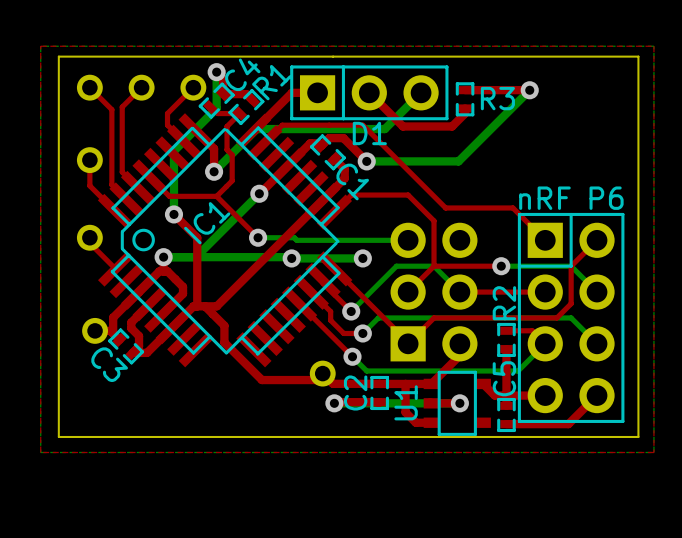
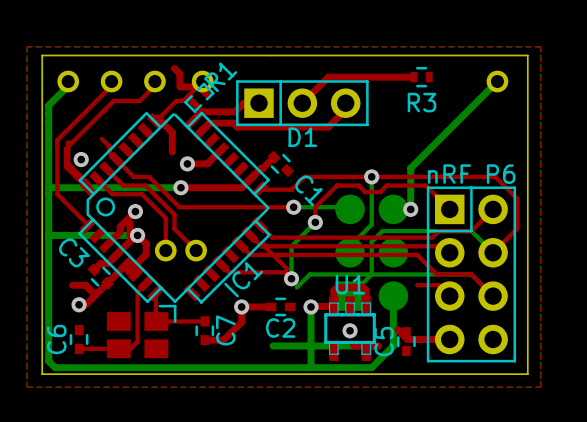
bottom track: (216, 72) (216, 108) (173, 151) (173, 214) -> none
via: (216, 72) -> none
R3 footprint: [455, 82, 475, 117] -> [410, 66, 433, 88]
top track: none -> (413, 77) (328, 77) (302, 103)
top track: (89, 87) (111, 109) (111, 184) (126, 200) -> none
bottom track: none -> (72, 81) (48, 105) (48, 361) (55, 367) (371, 367) (393, 345) (393, 298)
top track: (141, 87) (122, 107) (122, 172) (138, 188) -> none
top track: none -> (115, 81) (57, 140) (57, 194) (88, 225)
top track: (193, 87) (167, 113) (167, 125) (184, 142) -> none
top track: none -> (159, 81) (139, 101) (113, 101) (66, 148) (66, 167) (88, 189)
top track: none -> (202, 81) (183, 101) (176, 101) (155, 121)
part: none -> (202, 81)
bottom track: none -> (497, 81) (410, 168) (410, 209)
part: none -> (497, 81)
top track: (465, 90) (529, 90) -> none
bottom track: (529, 90) (458, 161) (366, 161) -> none
via: (529, 90) -> none
top track: (317, 92) (291, 92) (253, 131) -> none
top track: (369, 92) (402, 126) (452, 126) (465, 113) (465, 108) -> none
D1 position: (369, 92) -> (302, 103)
bottom track: (421, 92) (384, 129) (256, 129) (214, 171) -> none
R3 name position: R3 (497, 98) -> R3 (421, 102)
C4: (216, 100) -> none
top track: (211, 107) (217, 113) (239, 113) (227, 126) (227, 149) (232, 154) (232, 180) (216, 196) -> none
IC1 footprint: [97, 113, 353, 368] -> [78, 111, 271, 304]
top track: none -> (258, 103) (243, 103) (235, 111) (201, 111) (191, 121)
top track: none -> (345, 103) (345, 109) (328, 127) (237, 127) (233, 123) (209, 123) (201, 131)
C1 footprint: [309, 134, 346, 171] -> [267, 150, 294, 178]
top track: (264, 142) (282, 125) (362, 125) (445, 207) (512, 207) (516, 211) -> (315, 222) (315, 207) (337, 185) (358, 185) (365, 192) (380, 192) (386, 185) (425, 185)
top track: none -> (101, 138) (109, 146) (109, 152) (133, 176) (149, 176) (179, 207) (293, 207)
top track: (334, 158) (344, 169) (344, 178) (216, 306) (193, 306) (147, 352) (132, 352) (139, 346) (139, 336) (131, 328) (131, 322) (150, 303) -> none
part: (89, 160) -> none
top track: (366, 161) (343, 138) (329, 138) (321, 145) (318, 143) (310, 143) (259, 193) -> none
via: (366, 161) -> none
top track: none -> (220, 150) (207, 163) (187, 163)
via: (214, 171) -> none
top track: (150, 176) (169, 196) (216, 196) -> none
top track: none -> (274, 157) (241, 187) (180, 187)
via: none -> (81, 159)
via: none -> (187, 163)
top track: none -> (107, 169) (123, 185) (145, 185) (174, 214) (174, 228) (196, 250)
bottom track: (259, 193) (195, 257) -> none
via: (259, 193) -> none
top track: (216, 196) (258, 237) -> none
bottom track: none -> (371, 176) (371, 224) (350, 246) (350, 252)
via: none -> (371, 176)
top track: none -> (97, 179) (112, 194) (141, 194) (165, 218) (165, 250)
top track: (334, 212) (351, 195) (408, 195) (434, 220) (434, 266) -> none
bottom track: none -> (48, 187) (180, 187)
top track: (173, 214) (197, 237) (197, 306) -> none
via: (173, 214) -> none
via: none -> (180, 187)
top track: none -> (259, 189) (291, 189) (304, 176) (495, 176) (516, 198) (516, 228) (493, 252)
part footprint: [390, 222, 478, 362] -> [335, 194, 409, 311]
IC1 name position: IC1 (207, 223) -> IC1 (243, 279)
top track: (89, 237) (89, 243) (115, 269) -> none
part: (89, 237) -> none
bottom track: (258, 237) (294, 237) (296, 240) (408, 240) -> none
via: (258, 237) -> none
bottom track: none -> (293, 207) (347, 207) (350, 209)
via: none -> (293, 207)
top track: none -> (135, 211) (120, 226) (120, 231) (107, 244)
via: none -> (135, 211)
bottom track: none -> (315, 222) (291, 246) (291, 278)
via: none -> (315, 222)
bottom track: (163, 257) (362, 258) -> none
via: (163, 257) -> none
via: (291, 258) -> none
via: (362, 258) -> none
top track: none -> (259, 225) (272, 237) (432, 237) (438, 231) (471, 231)
top track: (434, 266) (501, 266) -> none
top track: (434, 266) (408, 292) -> none
bottom track: none -> (412, 231) (382, 231) (371, 241) (371, 274) (350, 296)
via position: (501, 266) -> (410, 209)
top track: (571, 266) (571, 303) (556, 317) -> (493, 296) (471, 274) (459, 274)
top track: (334, 268) (408, 343) (434, 317) (529, 317) -> (240, 244) (250, 254) (417, 254) (436, 274)
bottom track: none -> (48, 235) (137, 235)
via: none -> (137, 235)
top track: (183, 286) (167, 271) (159, 271) (113, 317) (113, 333) -> (146, 248) (146, 244) (136, 235) (107, 263) (100, 263) (94, 269)
part: none -> (165, 250)
part: none -> (196, 250)
top track: (311, 292) (330, 311) (330, 320) (343, 333) (362, 333) -> none
top track: (459, 292) (545, 292) -> (249, 234) (261, 246) (443, 246) (449, 252)
bottom track: (459, 292) (434, 266) (396, 266) (351, 311) -> none
top track: (299, 304) (352, 356) -> none
top track: none -> (126, 263) (85, 304)
top track: none -> (220, 264) (229, 272) (285, 272) (291, 278)
top track: (205, 306) (224, 325) (224, 342) (261, 380) (316, 380) (322, 373) (333, 383) (379, 383) -> none
via: (351, 311) -> none
via: none -> (291, 278)
C3 footprint: [108, 328, 145, 365] -> [87, 263, 115, 290]
top track: none -> (146, 283) (137, 291) (137, 341) (130, 348) (79, 348)
part: (95, 330) -> none
via: (362, 333) -> none
top track: none -> (155, 292) (156, 321) (204, 321)
R2: (506, 339) -> none
top track: (459, 343) (459, 355) (431, 383) (379, 383) -> none
bottom track: (545, 343) (518, 371) (366, 371) (352, 356) -> none
top track: (506, 349) (506, 405) -> none
via: none -> (79, 304)
via: none -> (241, 306)
top track: none -> (271, 306) (241, 306) (241, 322) (223, 340) (204, 340)
via: (352, 356) -> none
bottom track: none -> (311, 306) (311, 367)
via: none -> (311, 306)
top track: none -> (366, 306) (366, 290) (363, 287) (337, 287) (333, 290) (333, 306) (311, 306) (312, 308)
C3 name position: C3 (109, 364) -> C3 (74, 252)
U1 footprint: [423, 370, 491, 436] -> [324, 296, 376, 362]
part: (322, 373) -> none
C2 footprint: [370, 375, 389, 411] -> [266, 297, 296, 317]
C5 name position: C5 (504, 378) -> C5 (384, 341)
top track: (405, 383) (405, 412) (415, 422) (431, 422) -> none
C7: none -> (204, 330)
part: none -> (141, 331)
C6: none -> (79, 339)
top track: (597, 395) (568, 424) (506, 424) -> none
C5 footprint: [497, 397, 516, 433] -> [397, 327, 416, 357]
U1 name position: U1 (406, 402) -> U1 (350, 284)
top track: (334, 403) (379, 402) (378, 403) -> none
via: (334, 403) -> none
via position: (459, 403) -> (350, 330)

